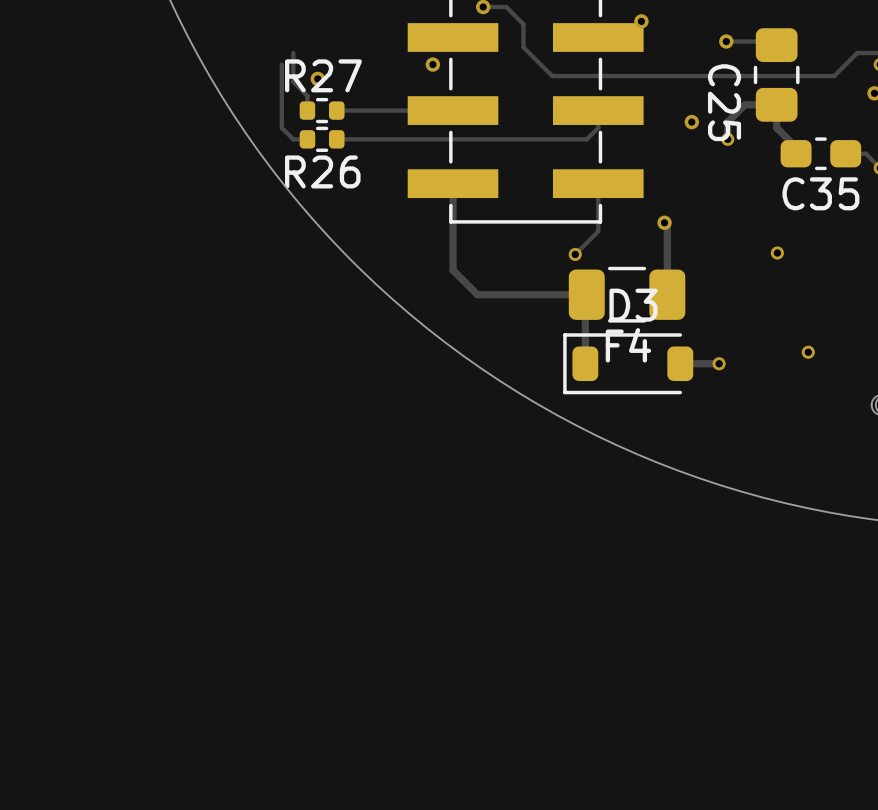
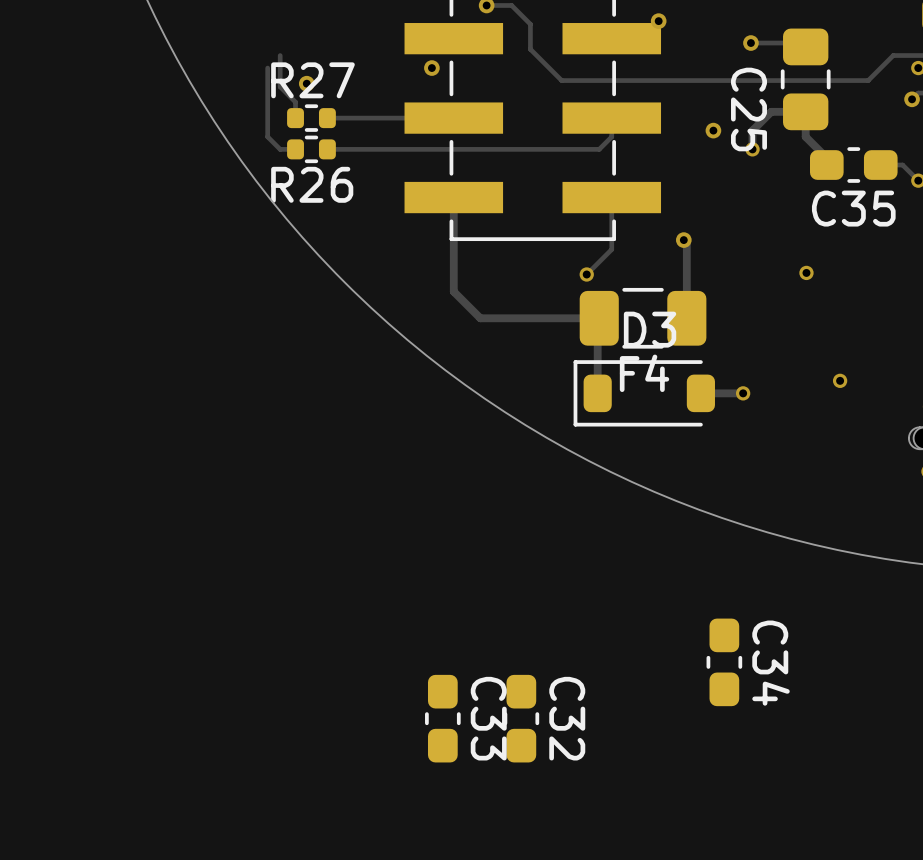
C34: none -> (724, 662)
C33: none -> (442, 718)
C32: none -> (521, 718)

